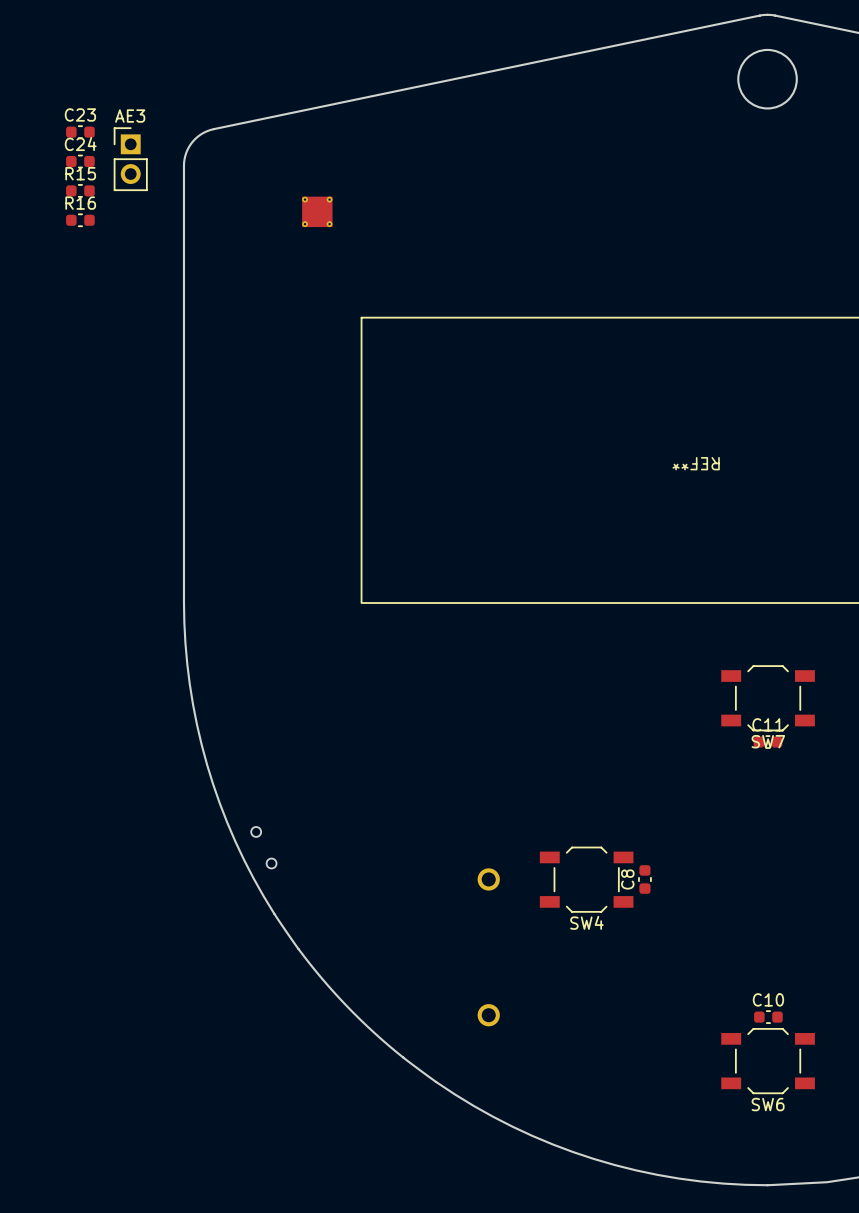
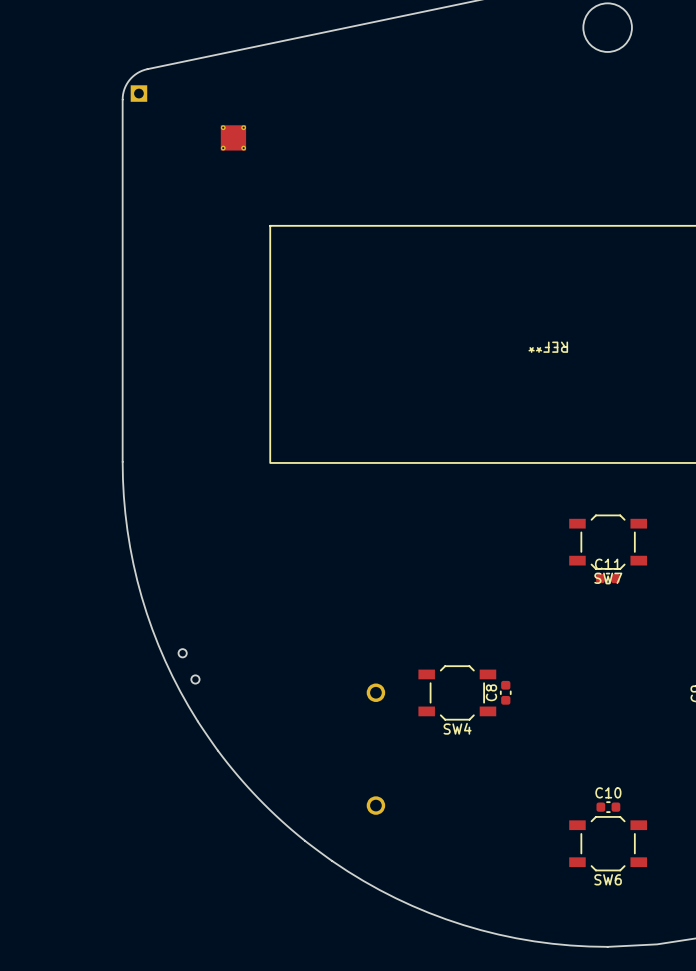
C23: (80, 132) -> none
part: none -> (138, 93)
AE3: (130, 159) -> none
C24: (80, 161) -> none
R15: (80, 190) -> none
R16: (80, 220) -> none

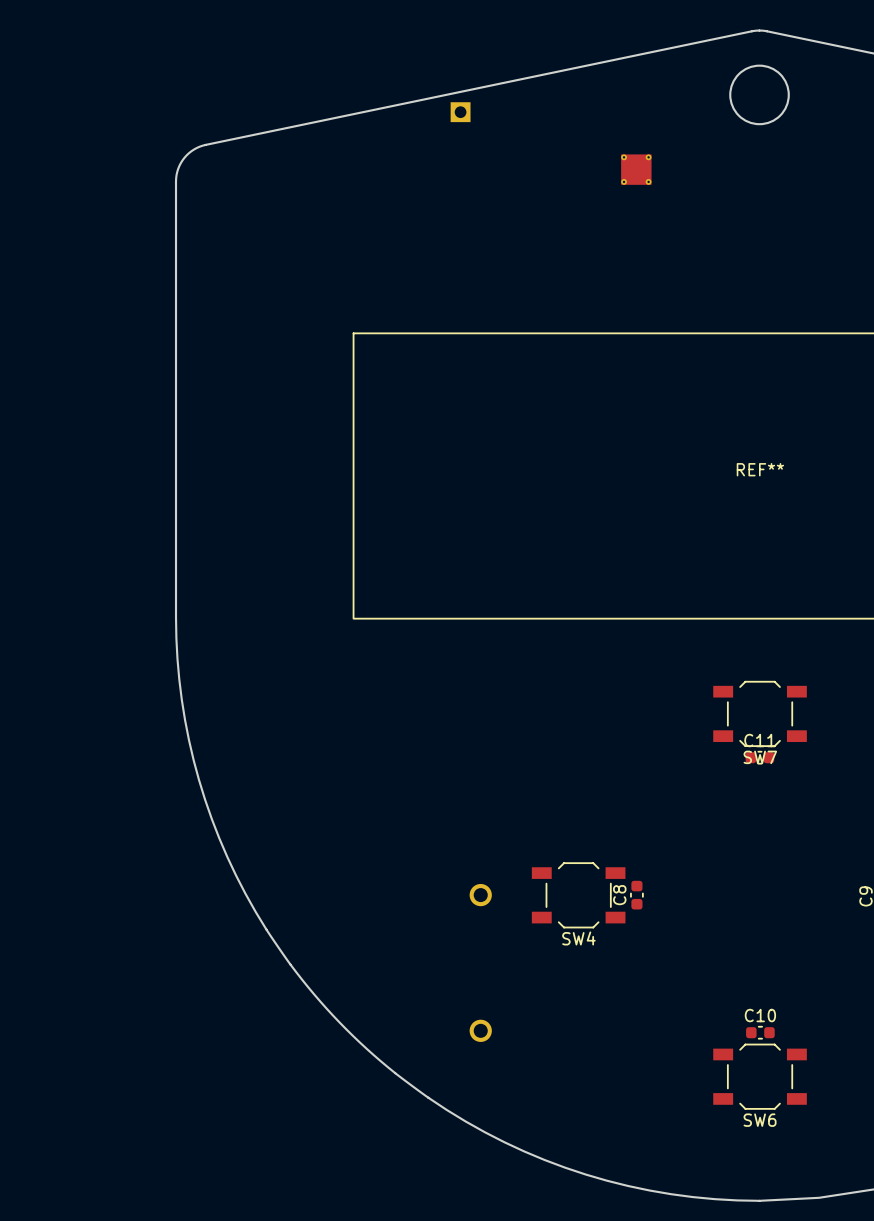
part: none -> (636, 169)
part position: (138, 93) -> (460, 112)
part: (233, 137) -> none
REF** name rotation: 0° (548, 347) -> 180° (760, 469)
REF** name position: REF** (548, 347) -> REF** (760, 469)
part: (189, 666) -> none

